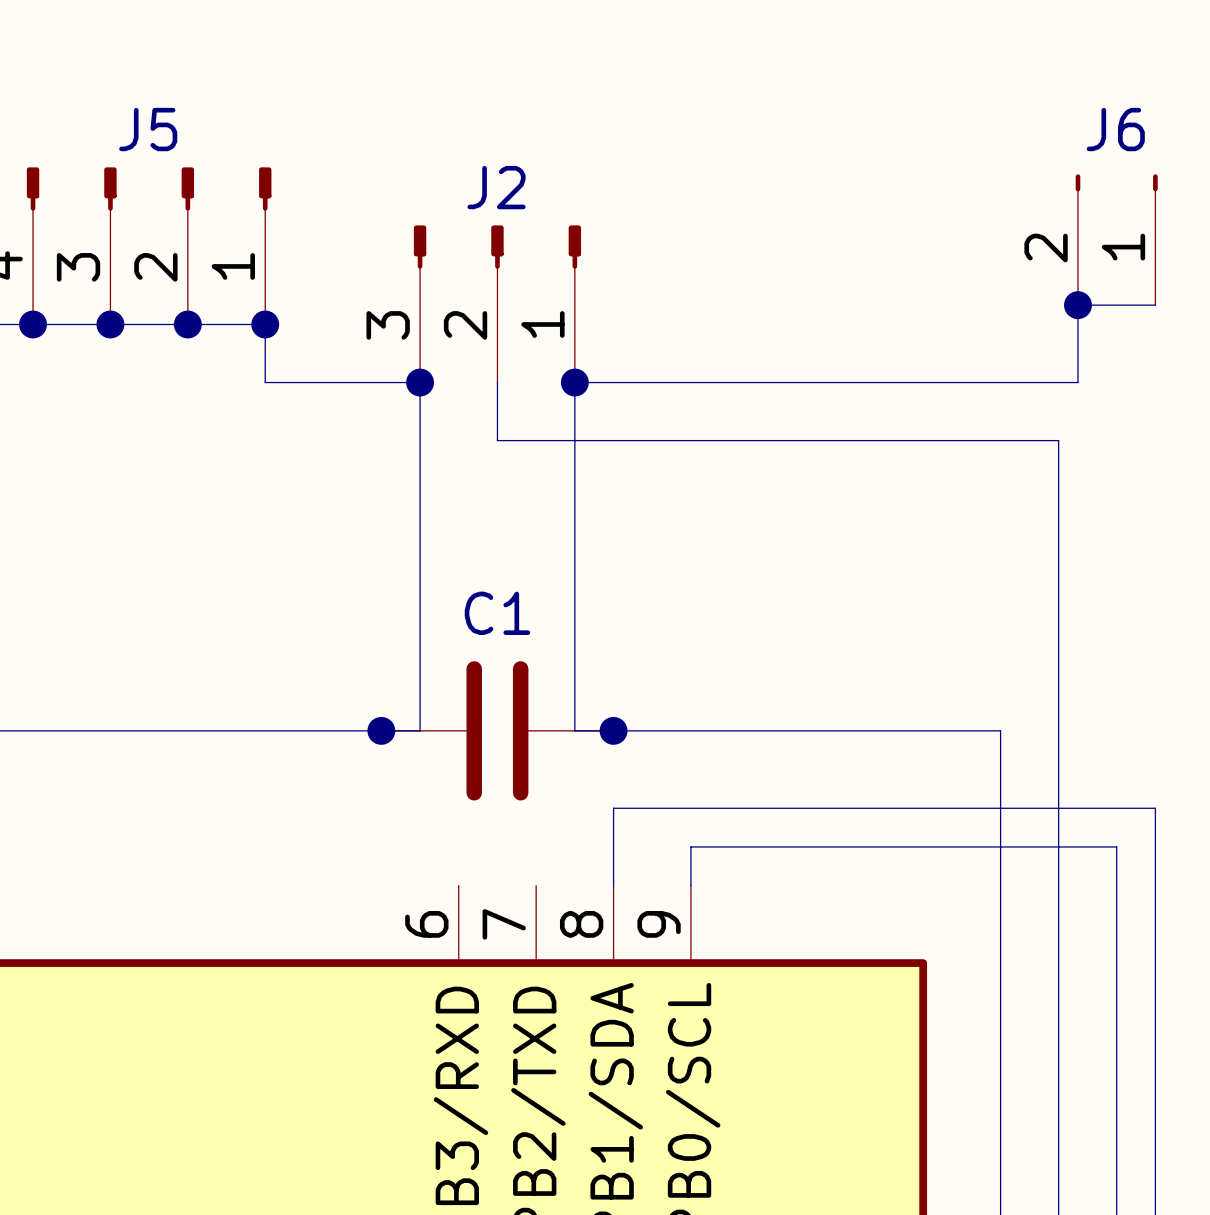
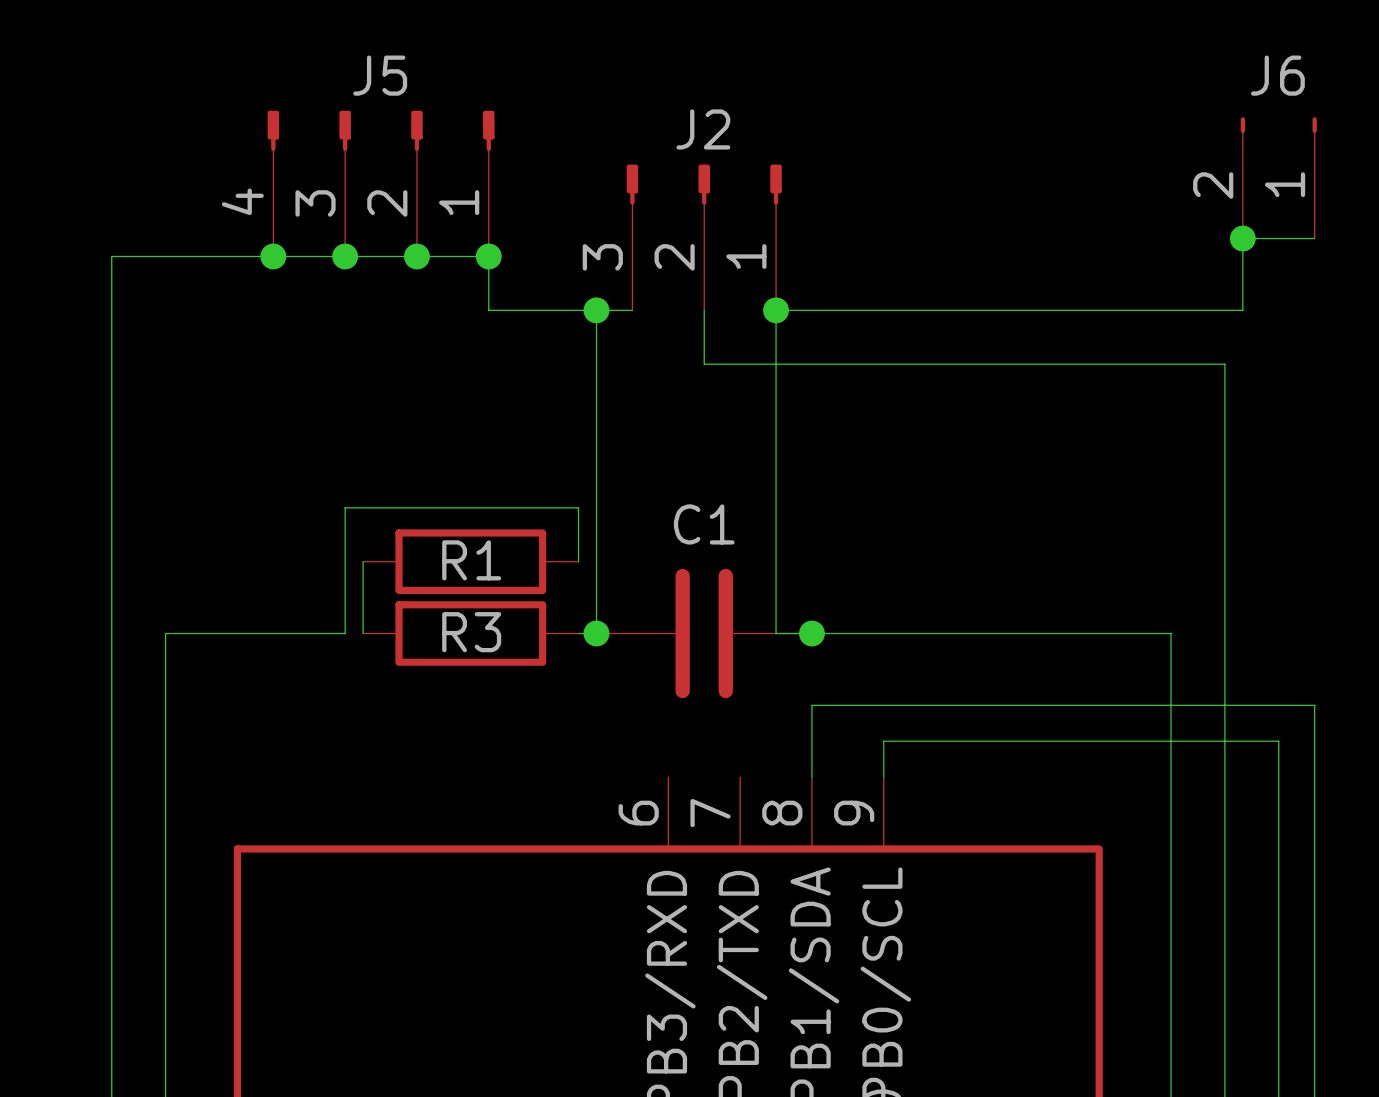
wire: (420, 382) (420, 730) (381, 730) -> (596, 310) (596, 633)
junction position: (420, 382) -> (596, 310)
wire: none -> (363, 561) (363, 633)
R1: none -> (470, 561)
wire: (110, 730) (362, 730) -> (345, 633) (345, 507) (578, 507) (578, 561)
R3: none -> (470, 633)

